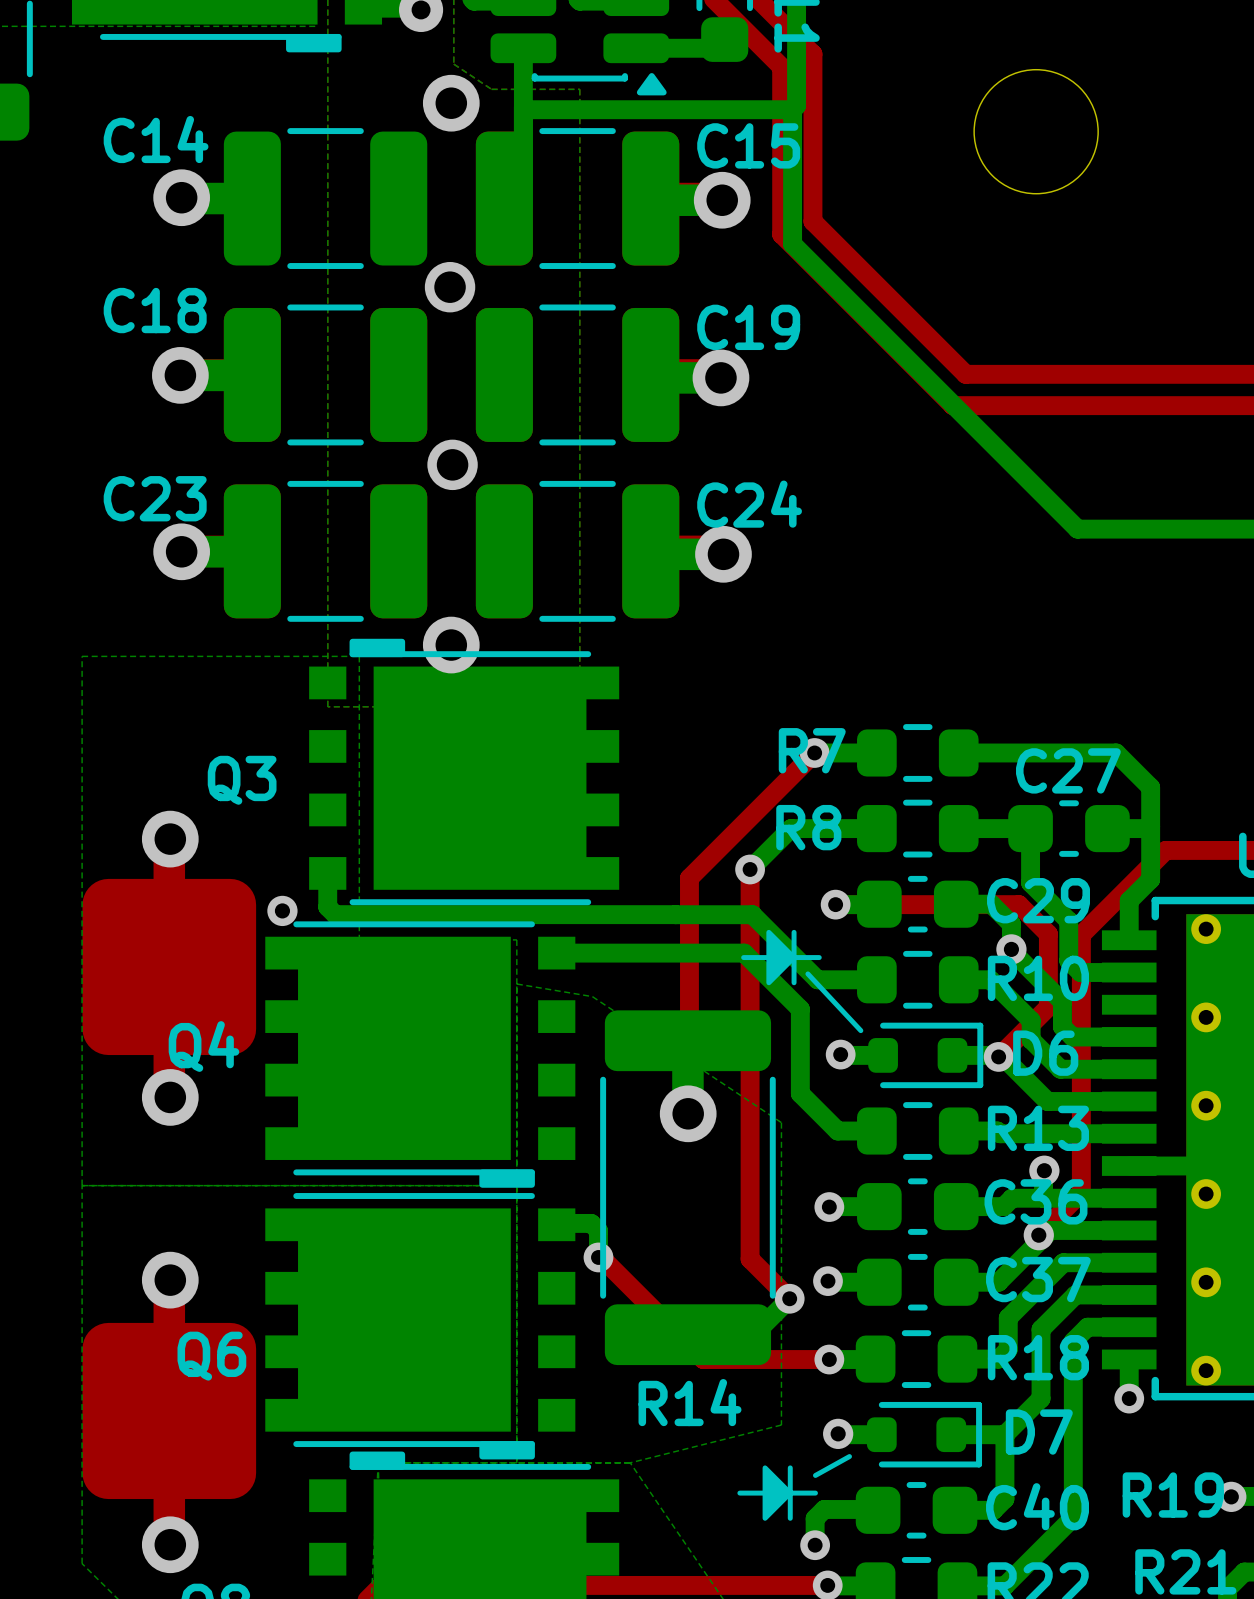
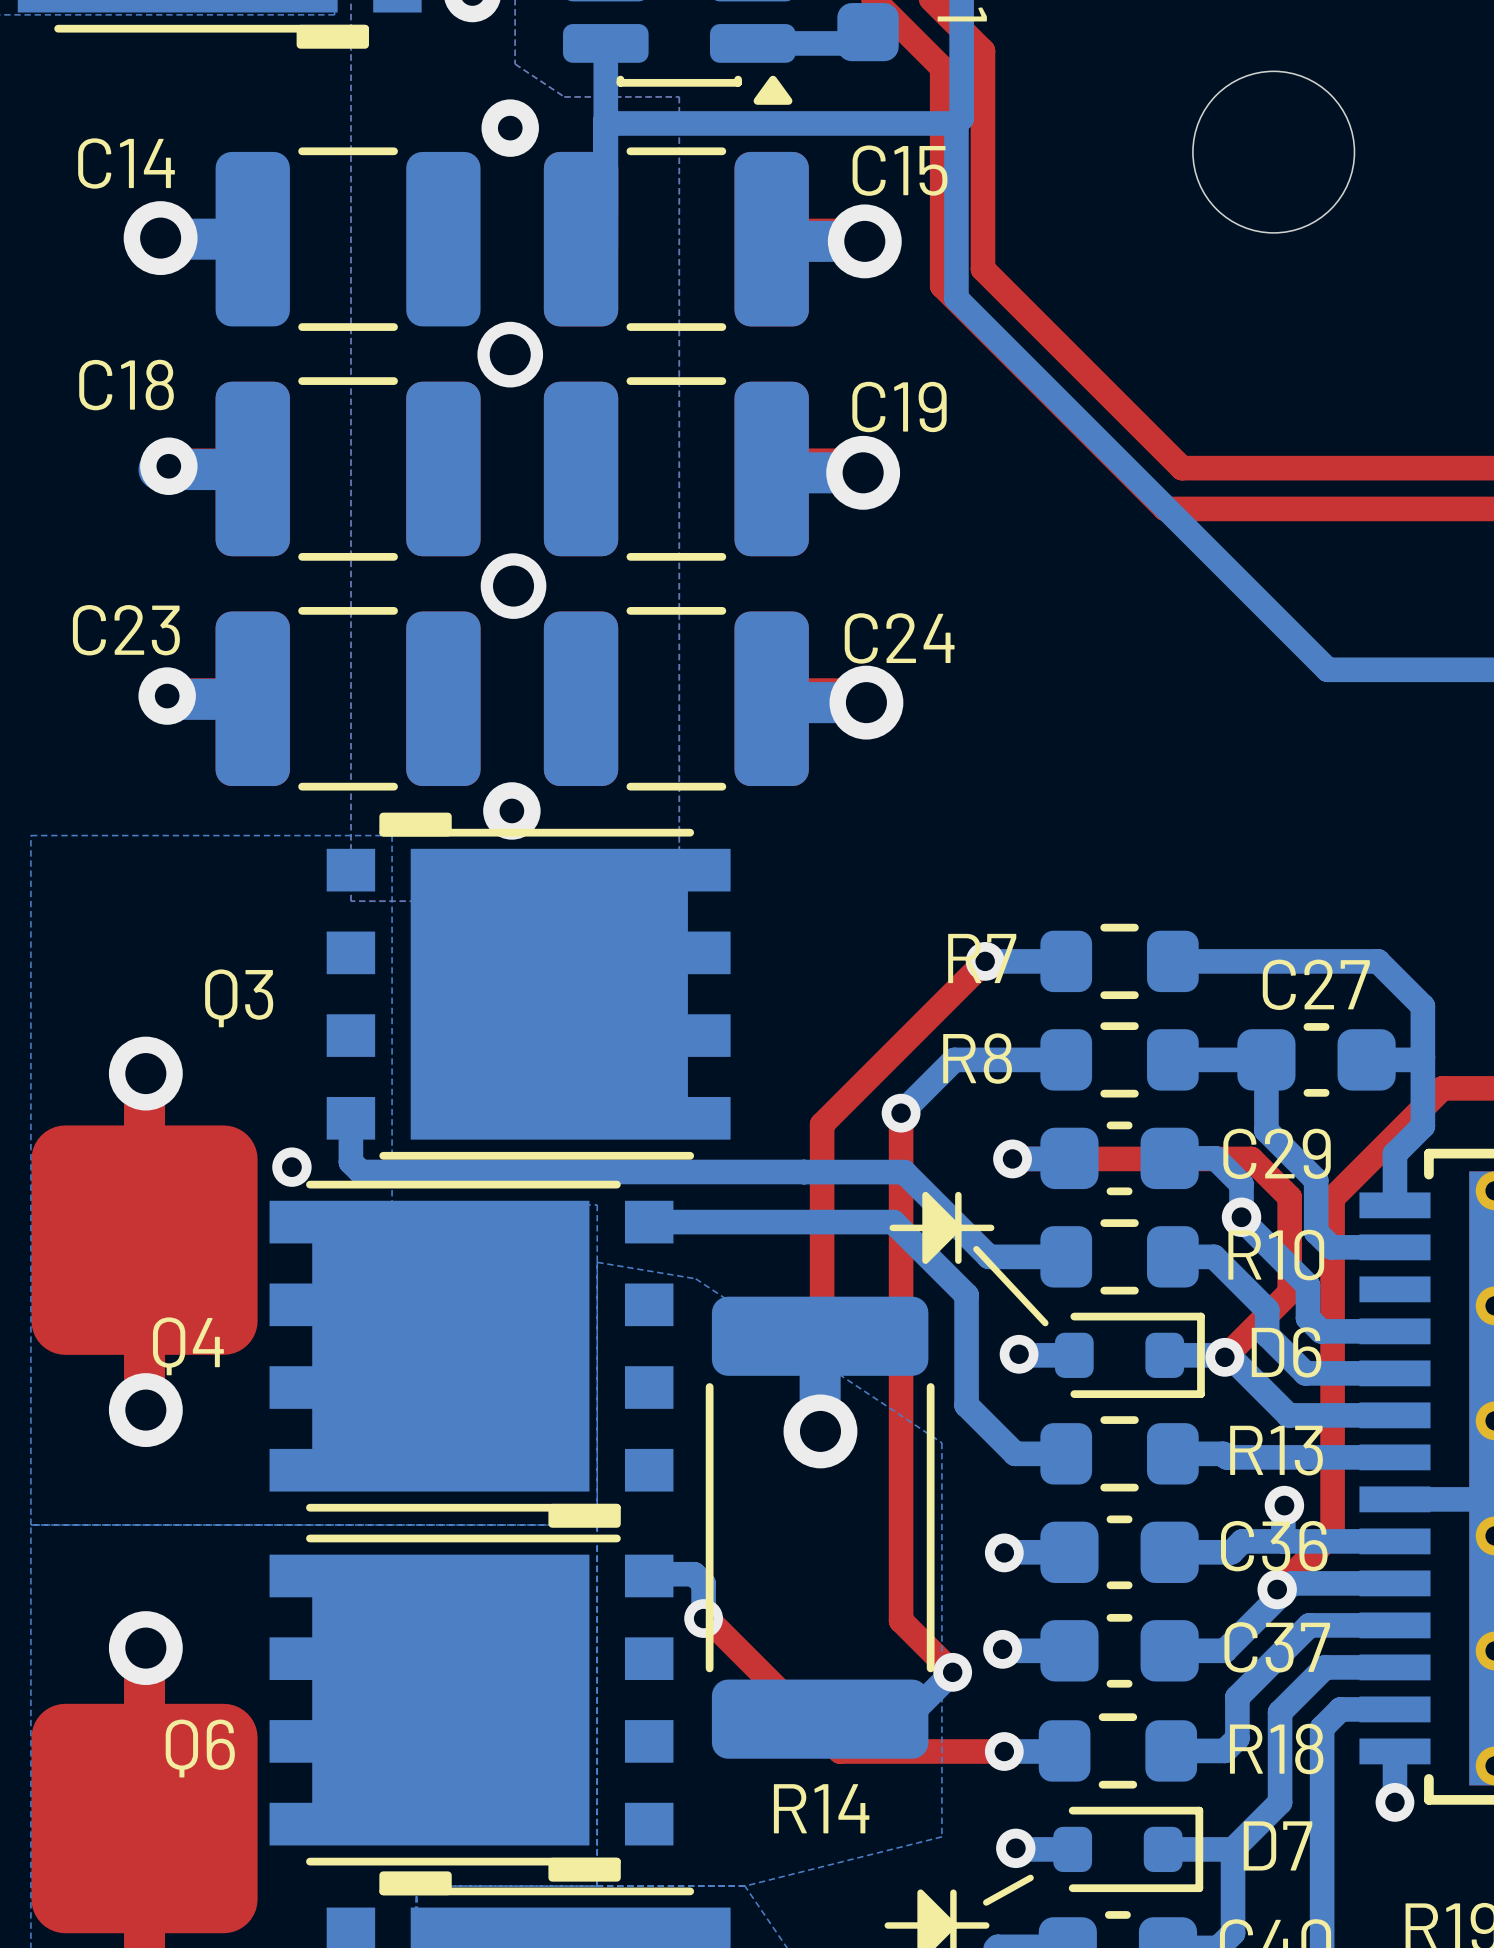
via size: [422, 74, 480, 132] -> [481, 99, 539, 157]
via size: [152, 347, 209, 404] -> [140, 437, 198, 495]
via size: [153, 523, 210, 581] -> [138, 667, 196, 725]
via size: [422, 616, 480, 674] -> [483, 782, 541, 840]

